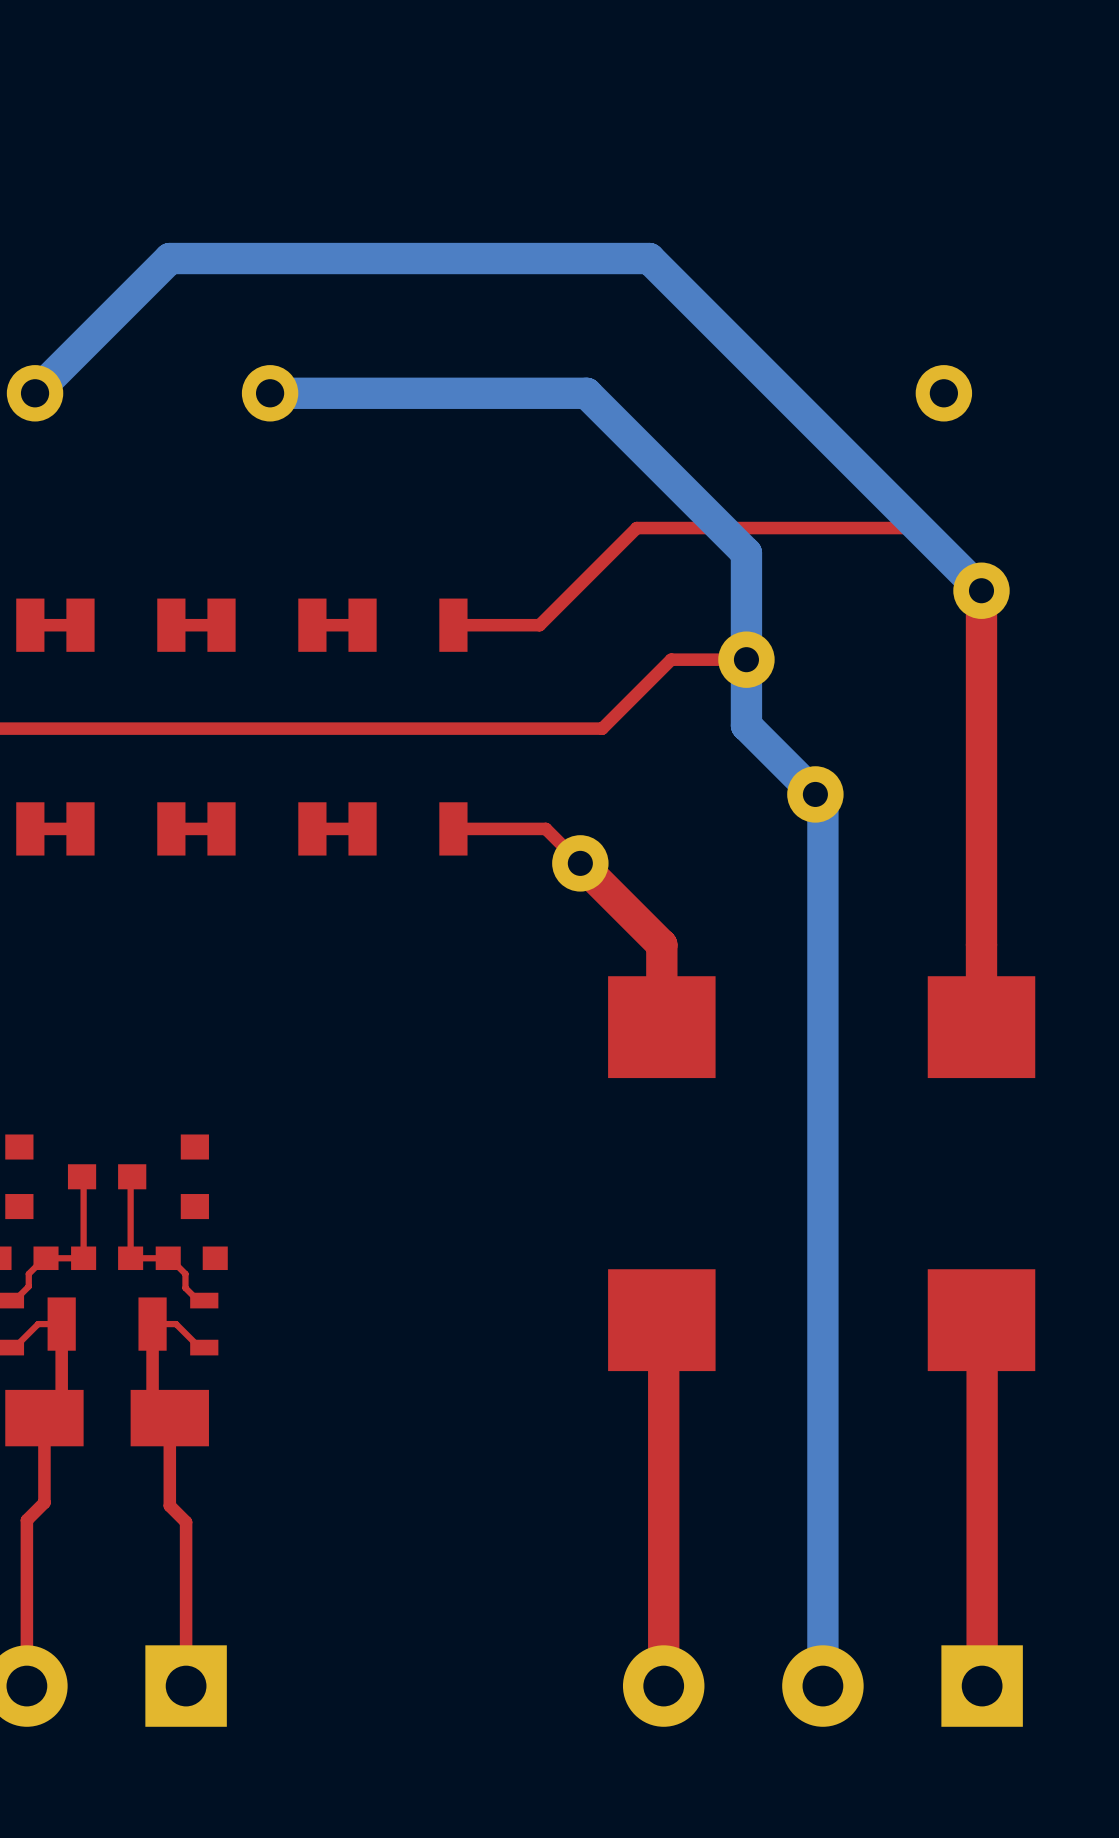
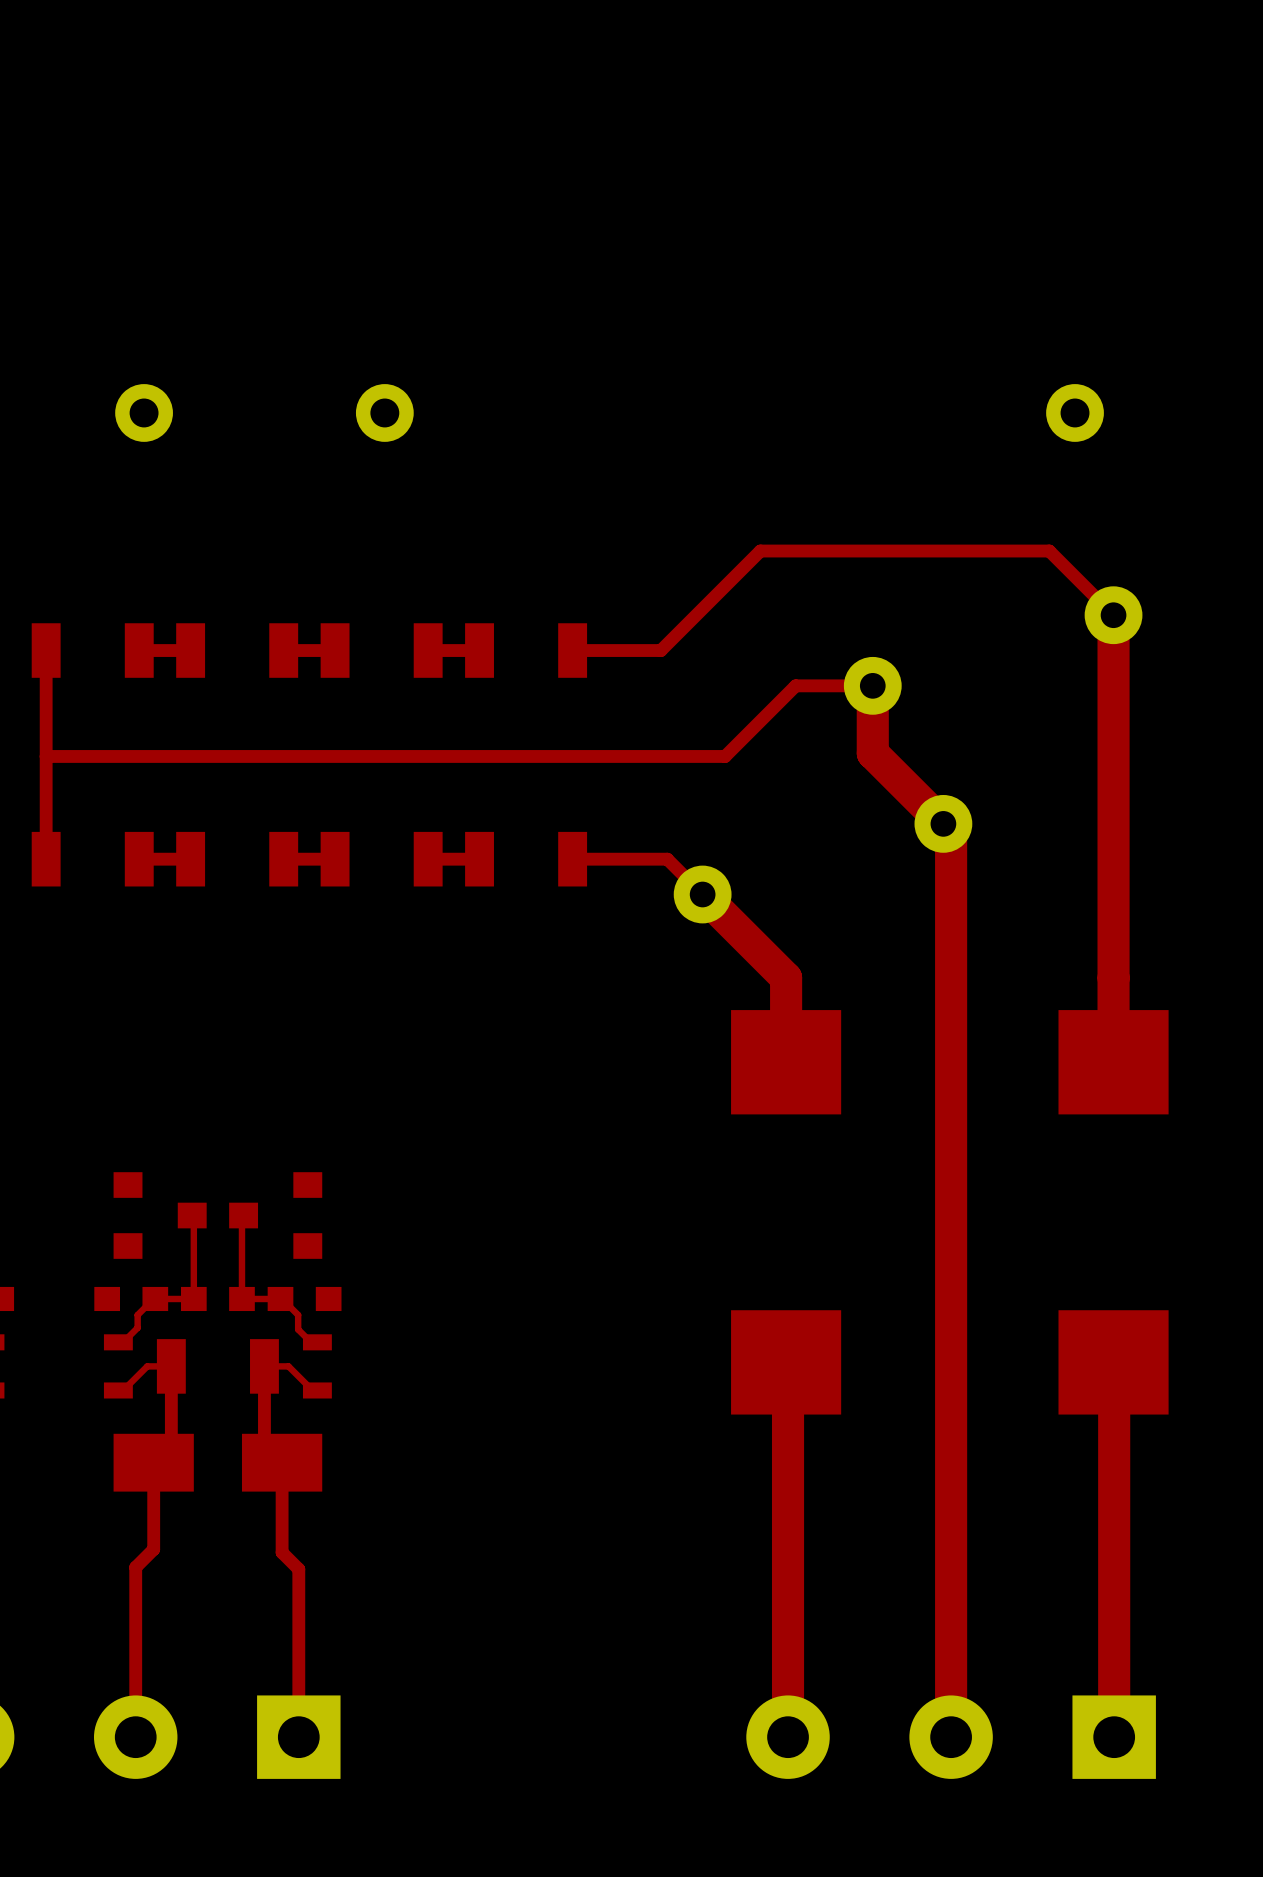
bottom track: (35, 393) (169, 258) (649, 258) (981, 590) -> none
bottom track: (270, 393) (586, 393) (746, 553) (746, 725) (822, 801) (822, 1686) -> none
top track: none -> (872, 685) (872, 753) (943, 823)
top track: none -> (951, 831) (951, 1737)

